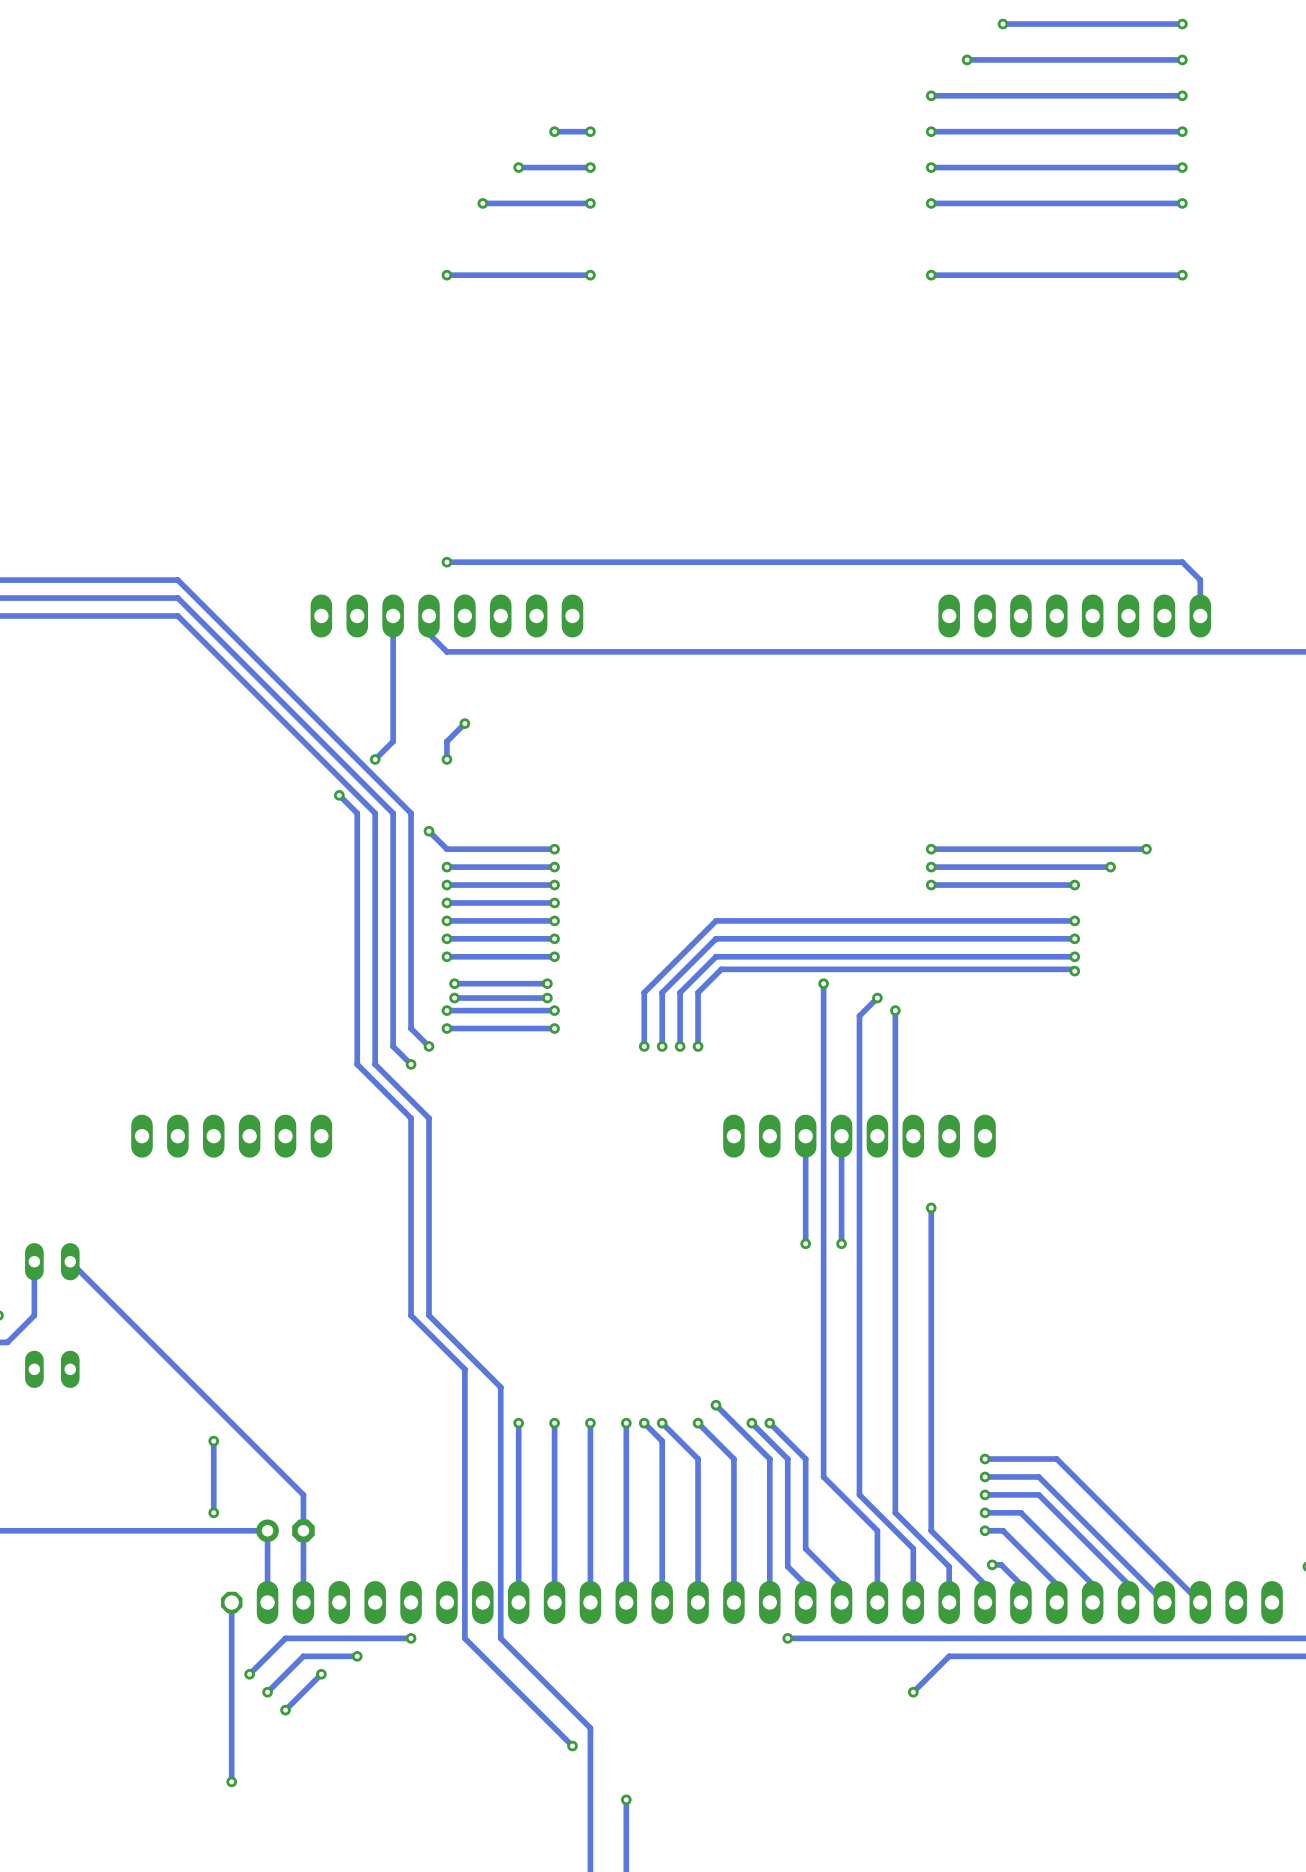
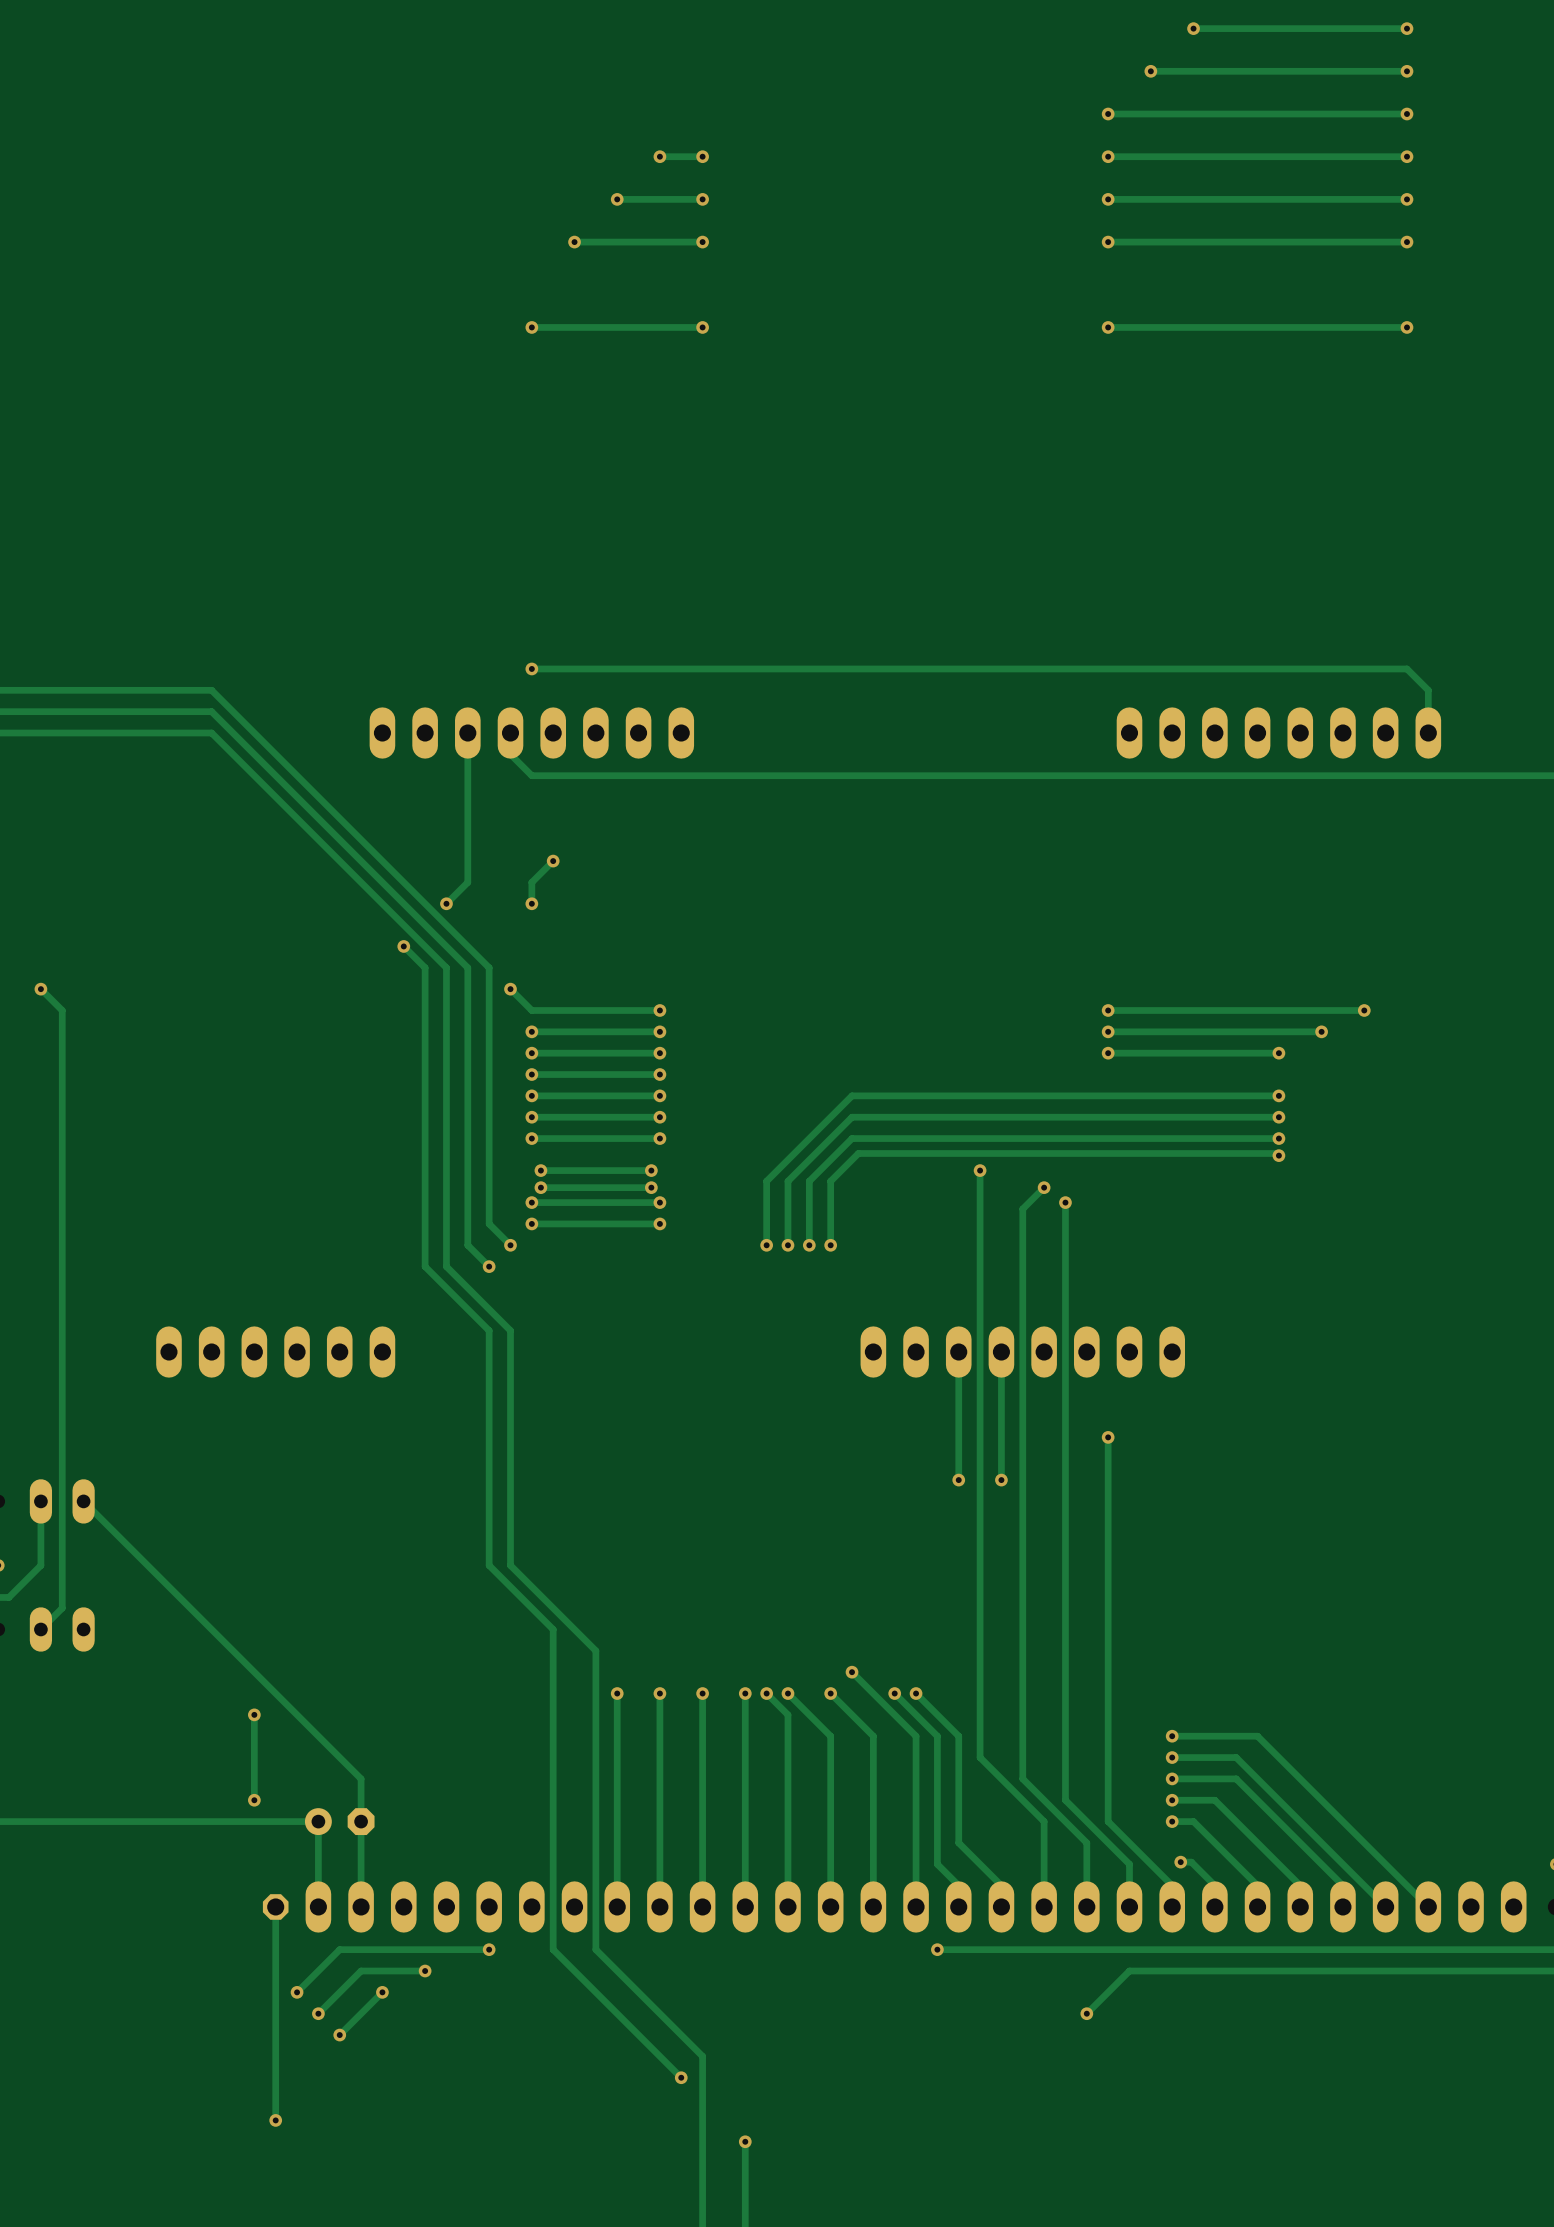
track: none -> (40, 989) (62, 1010) (62, 1608) (40, 1629)
via: none -> (40, 989)

